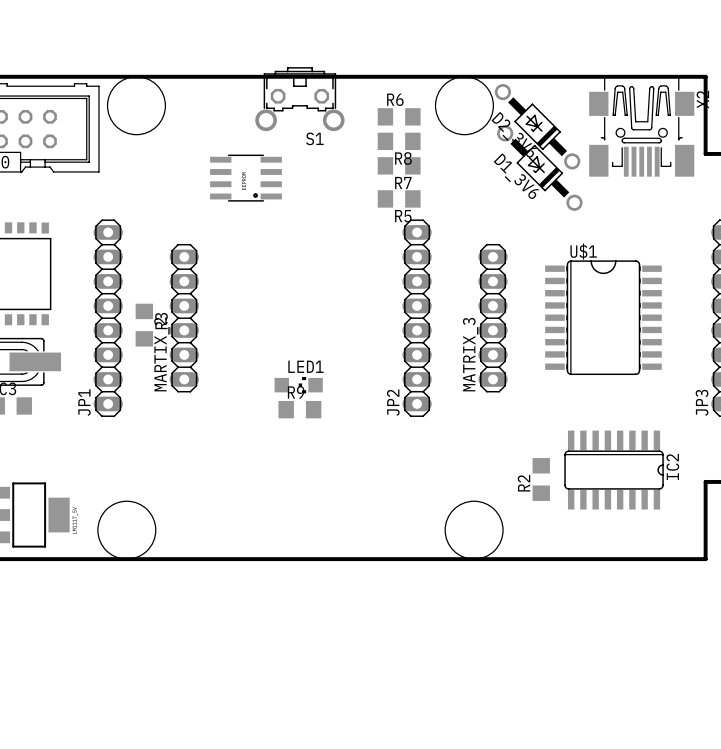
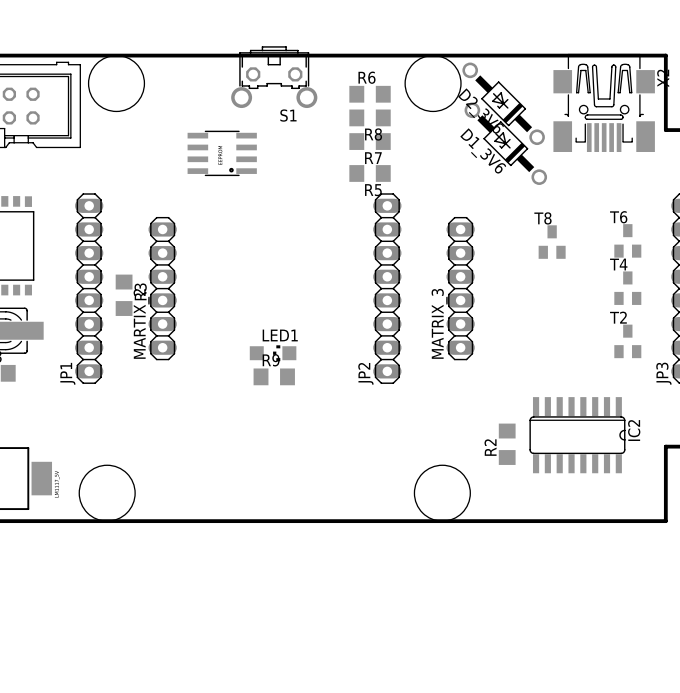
T6: none -> (627, 240)
T8: none -> (552, 242)
U$1: (603, 317) -> none
T4: none -> (627, 288)
T2: none -> (627, 341)

